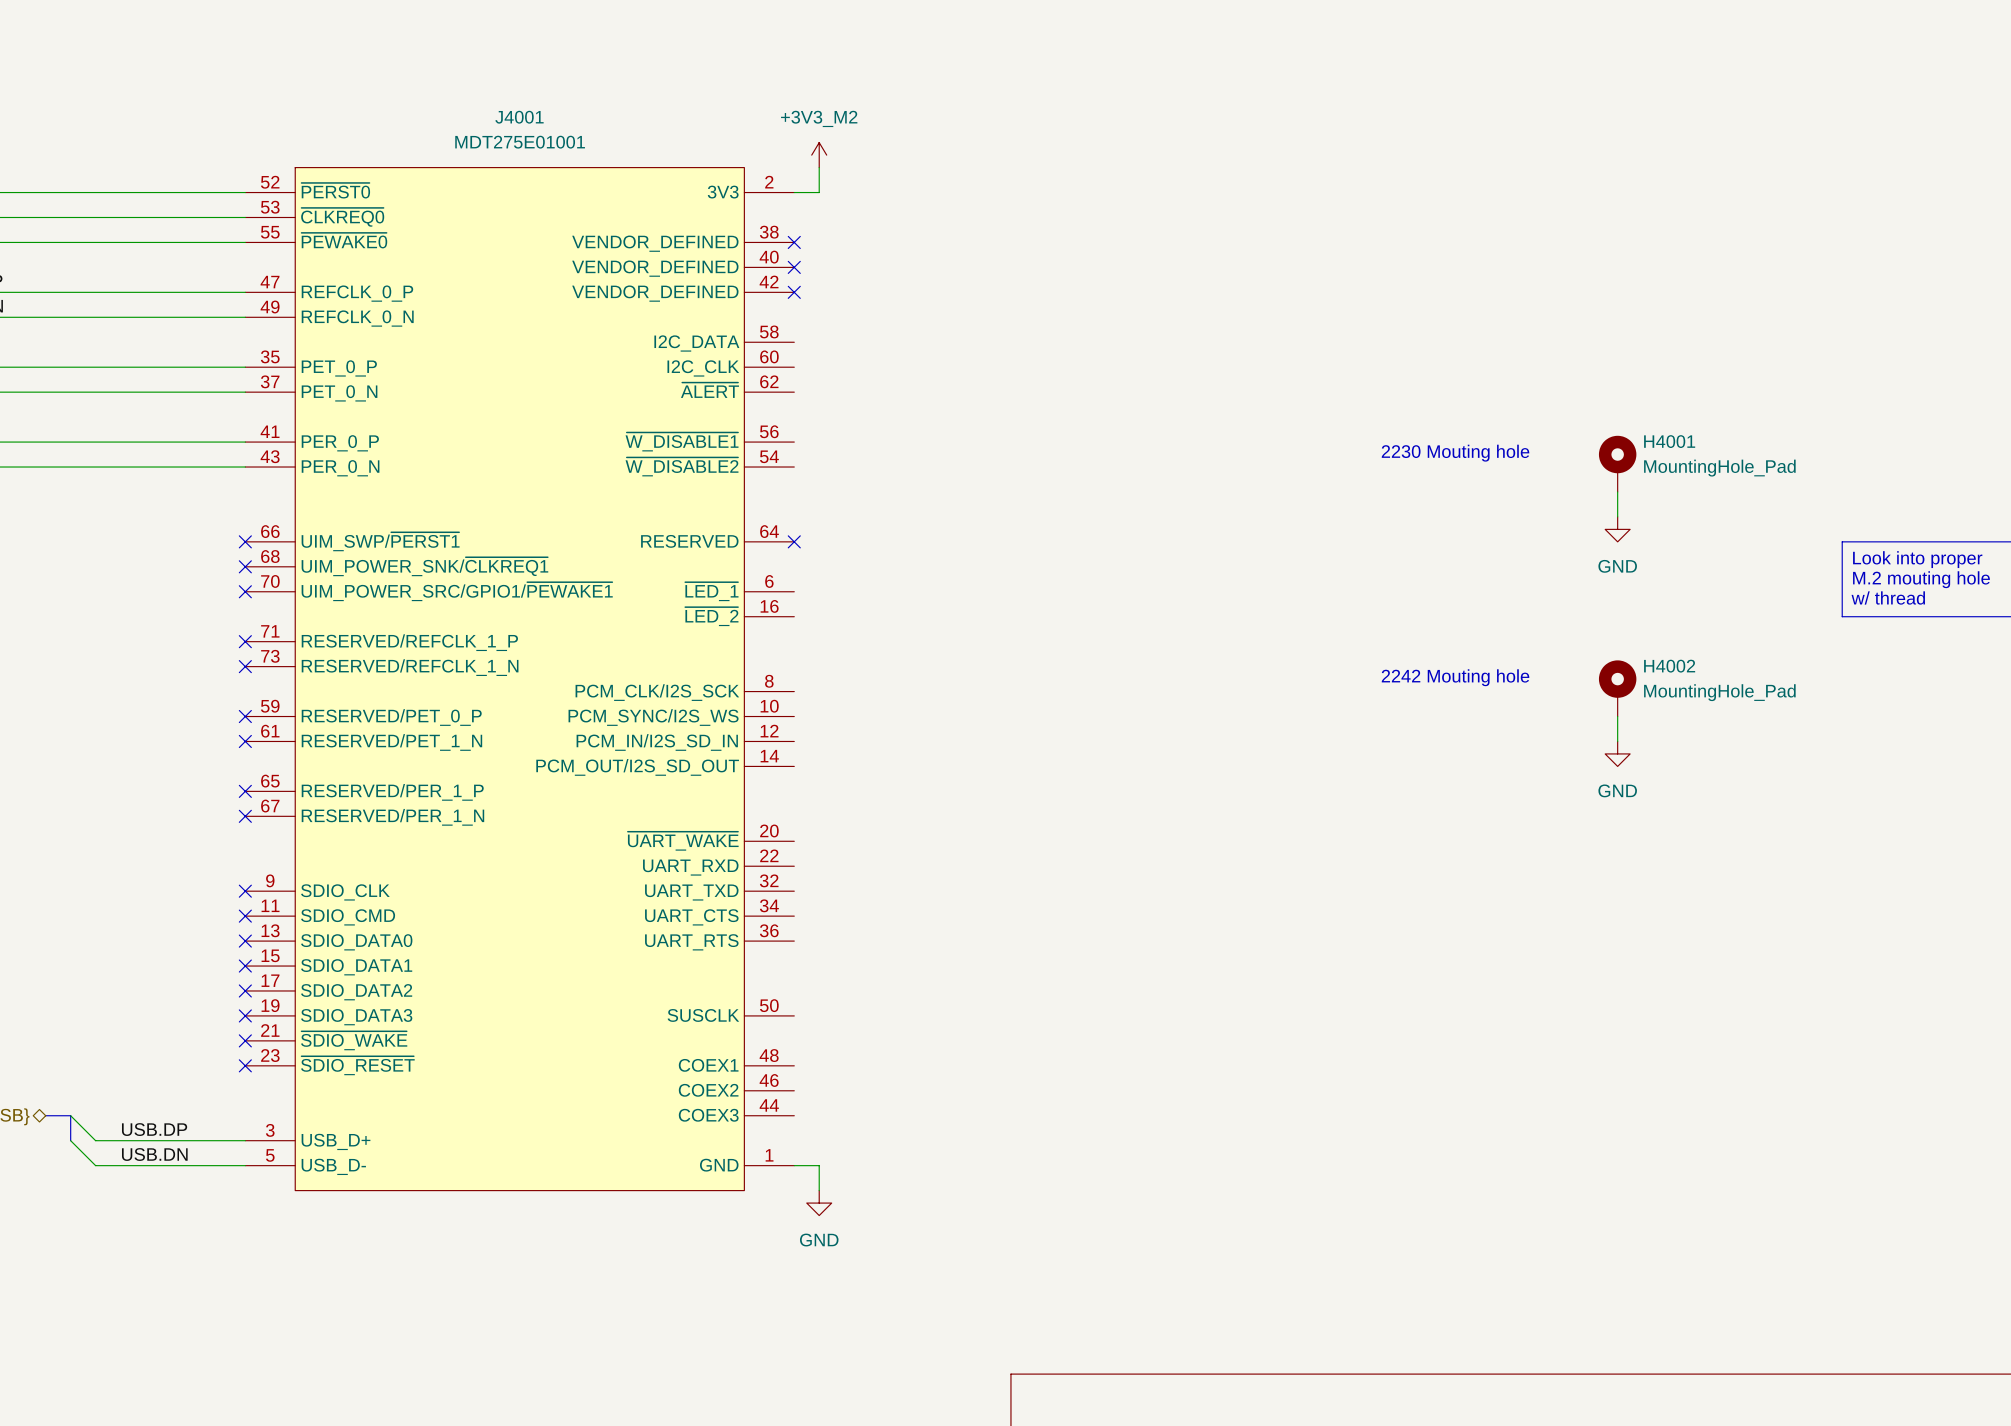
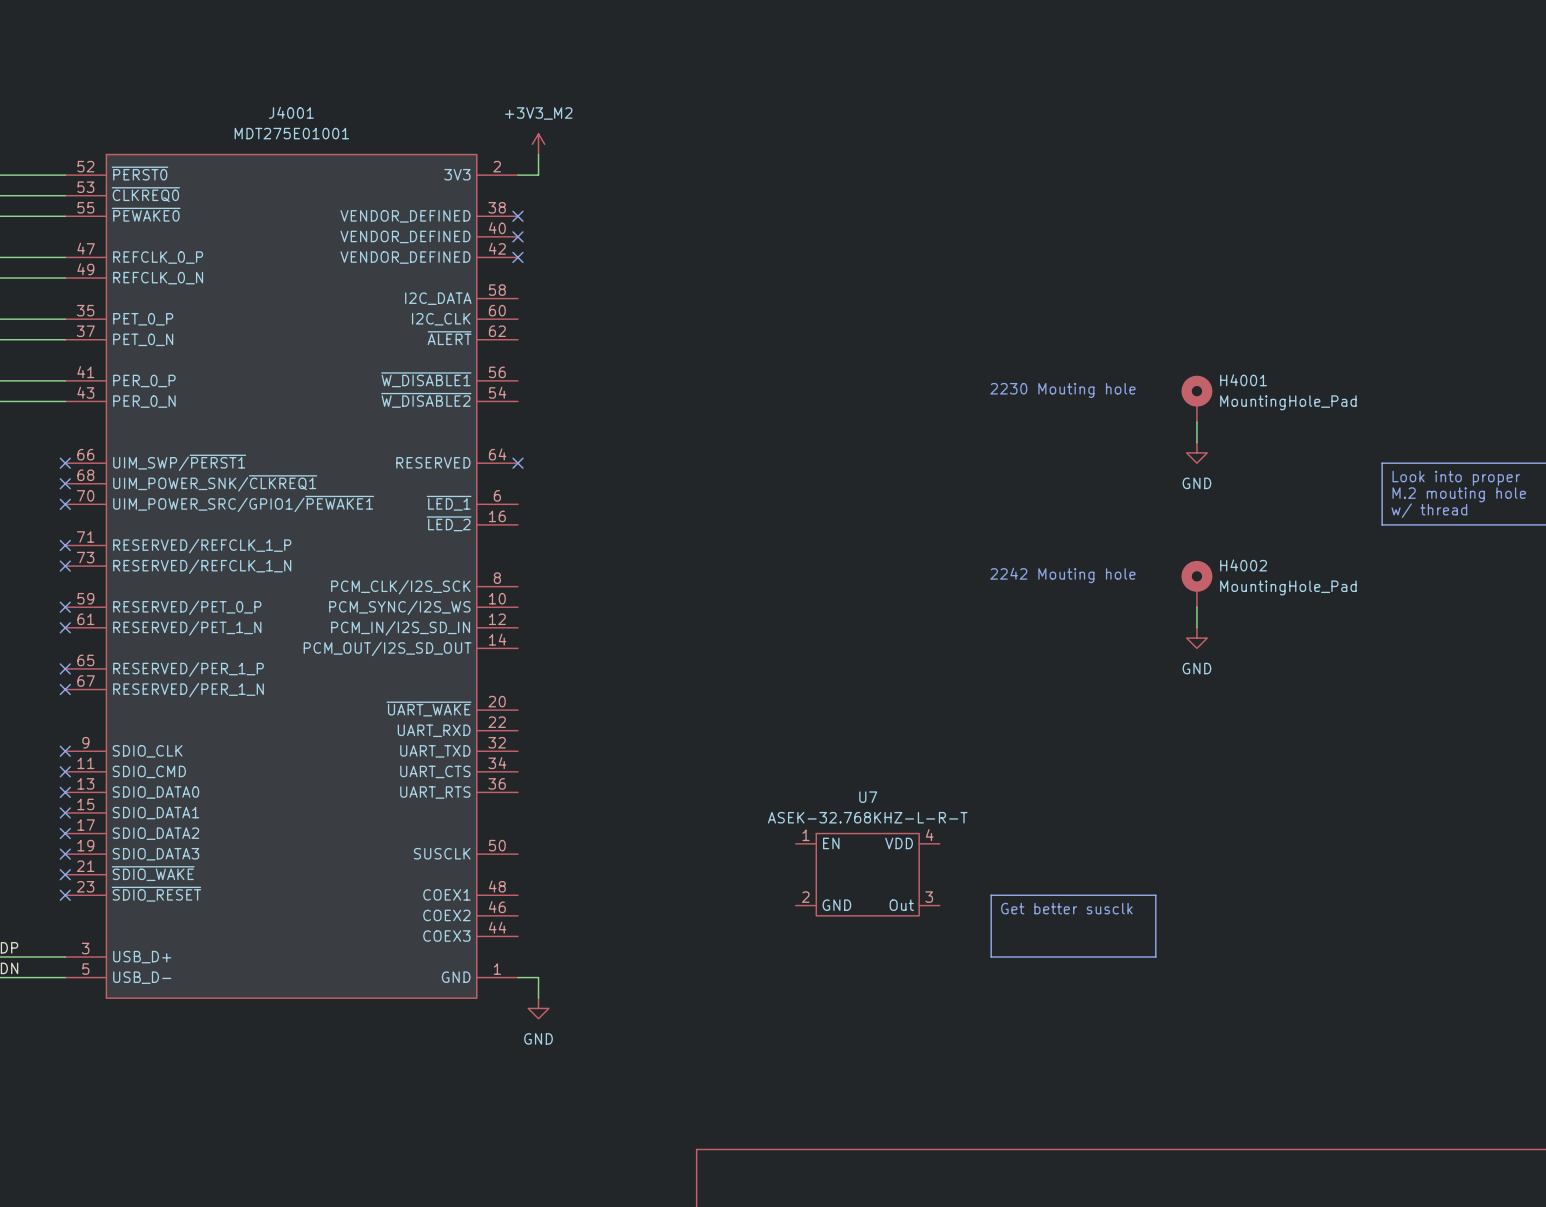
U7: none -> ASEK-32.768KHZ-L-R-T (867, 874)
line: none -> (991, 895) (1155, 895) (1155, 957) (991, 957) (991, 895)
text: none -> Get better susclk (1066, 908)

